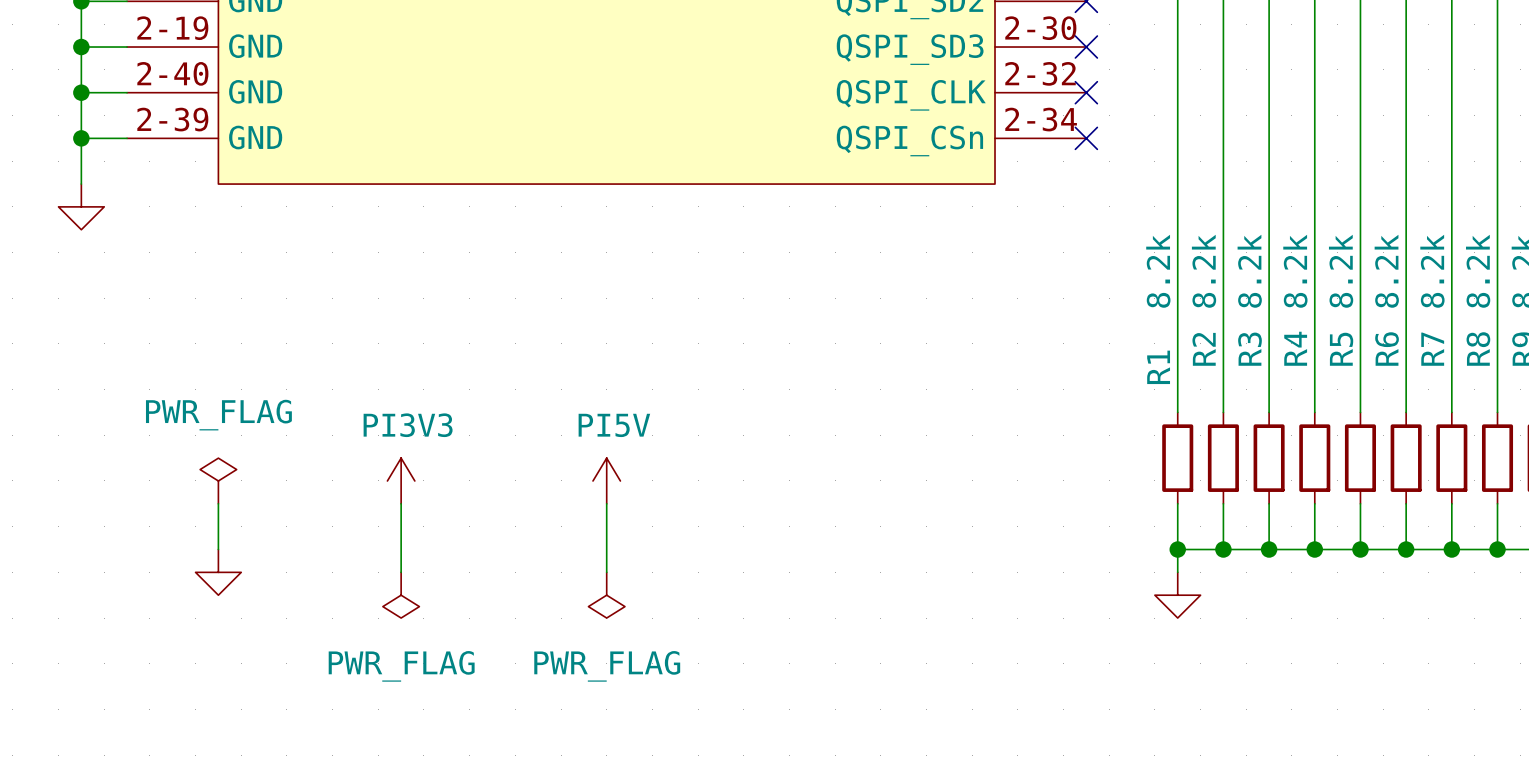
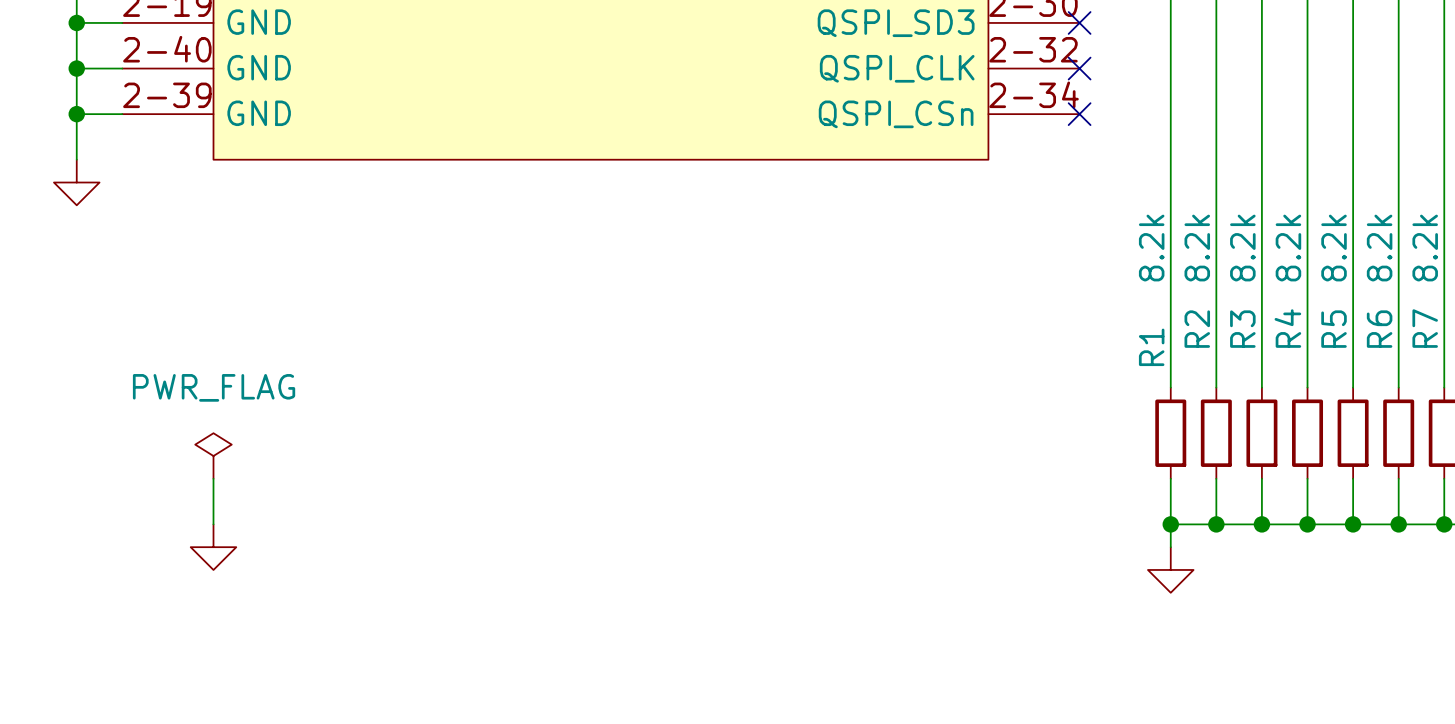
power symbol: PI3V3 (401, 480) -> none
power symbol: PI5V (606, 480) -> none
wire: (401, 503) (401, 572) -> none
wire: (606, 503) (606, 572) -> none
power symbol: PWR_FLAG (401, 595) -> none
power symbol: PWR_FLAG (606, 595) -> none

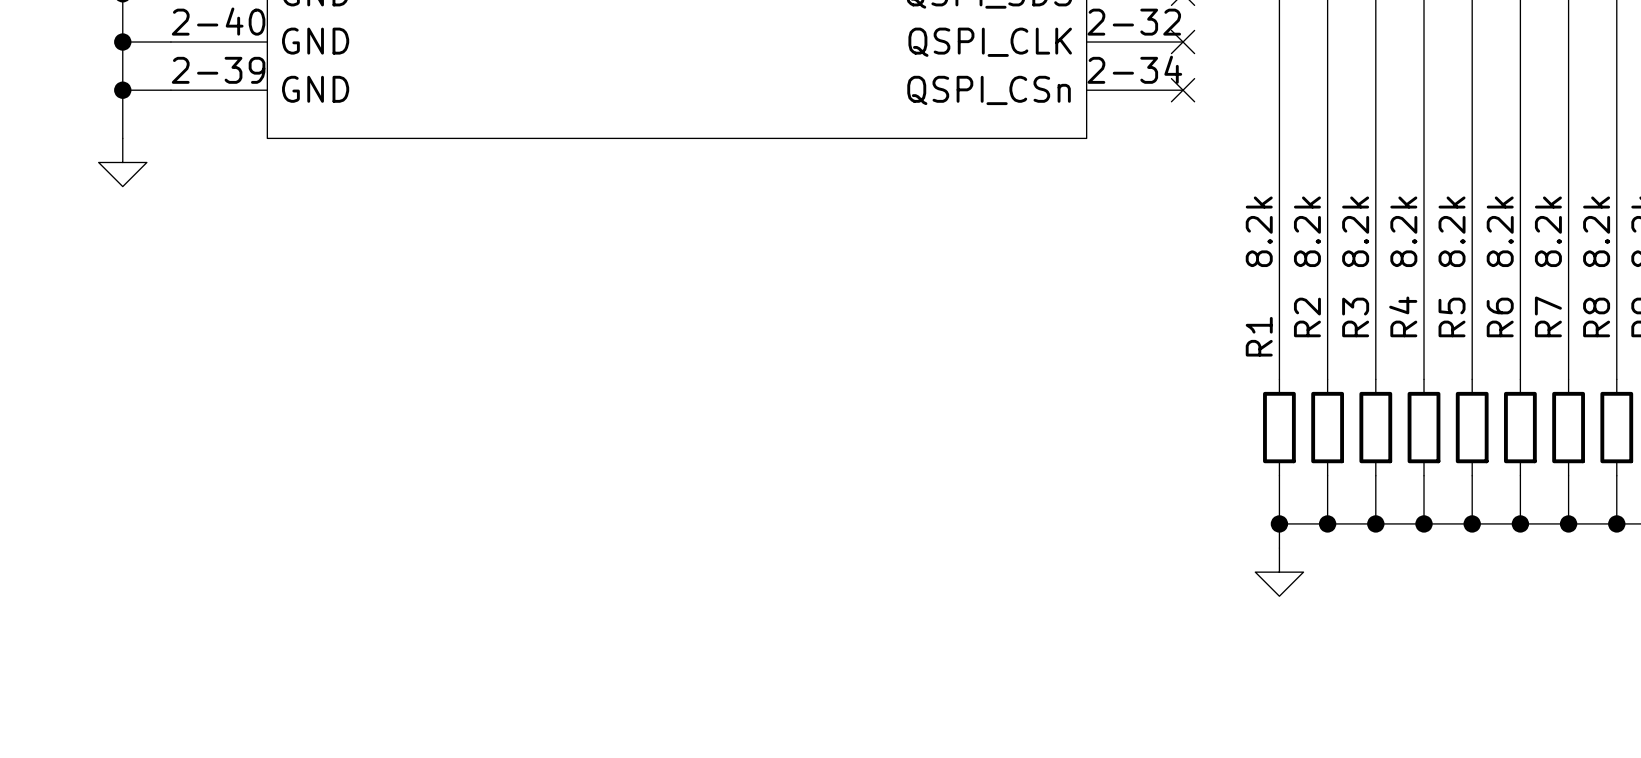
power symbol: PWR_FLAG (213, 456) -> none
wire: (213, 478) (213, 524) -> none
power symbol: (213, 547) -> none

